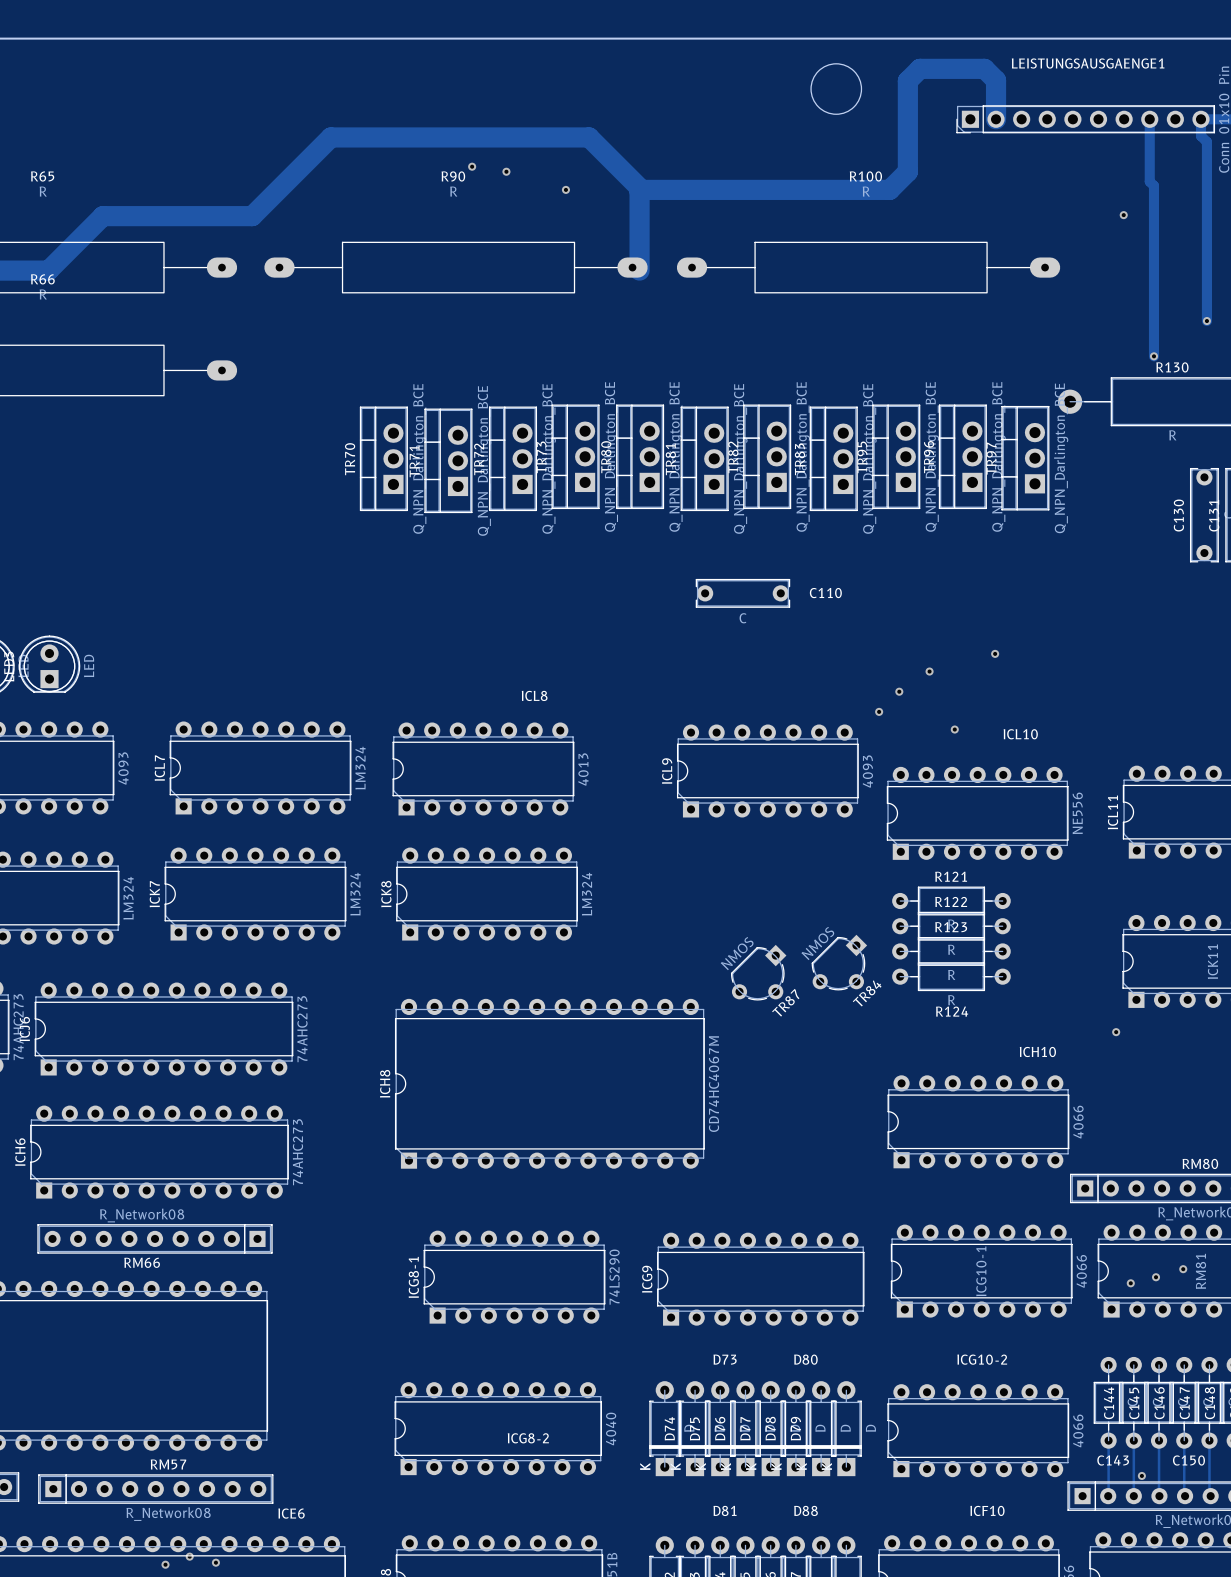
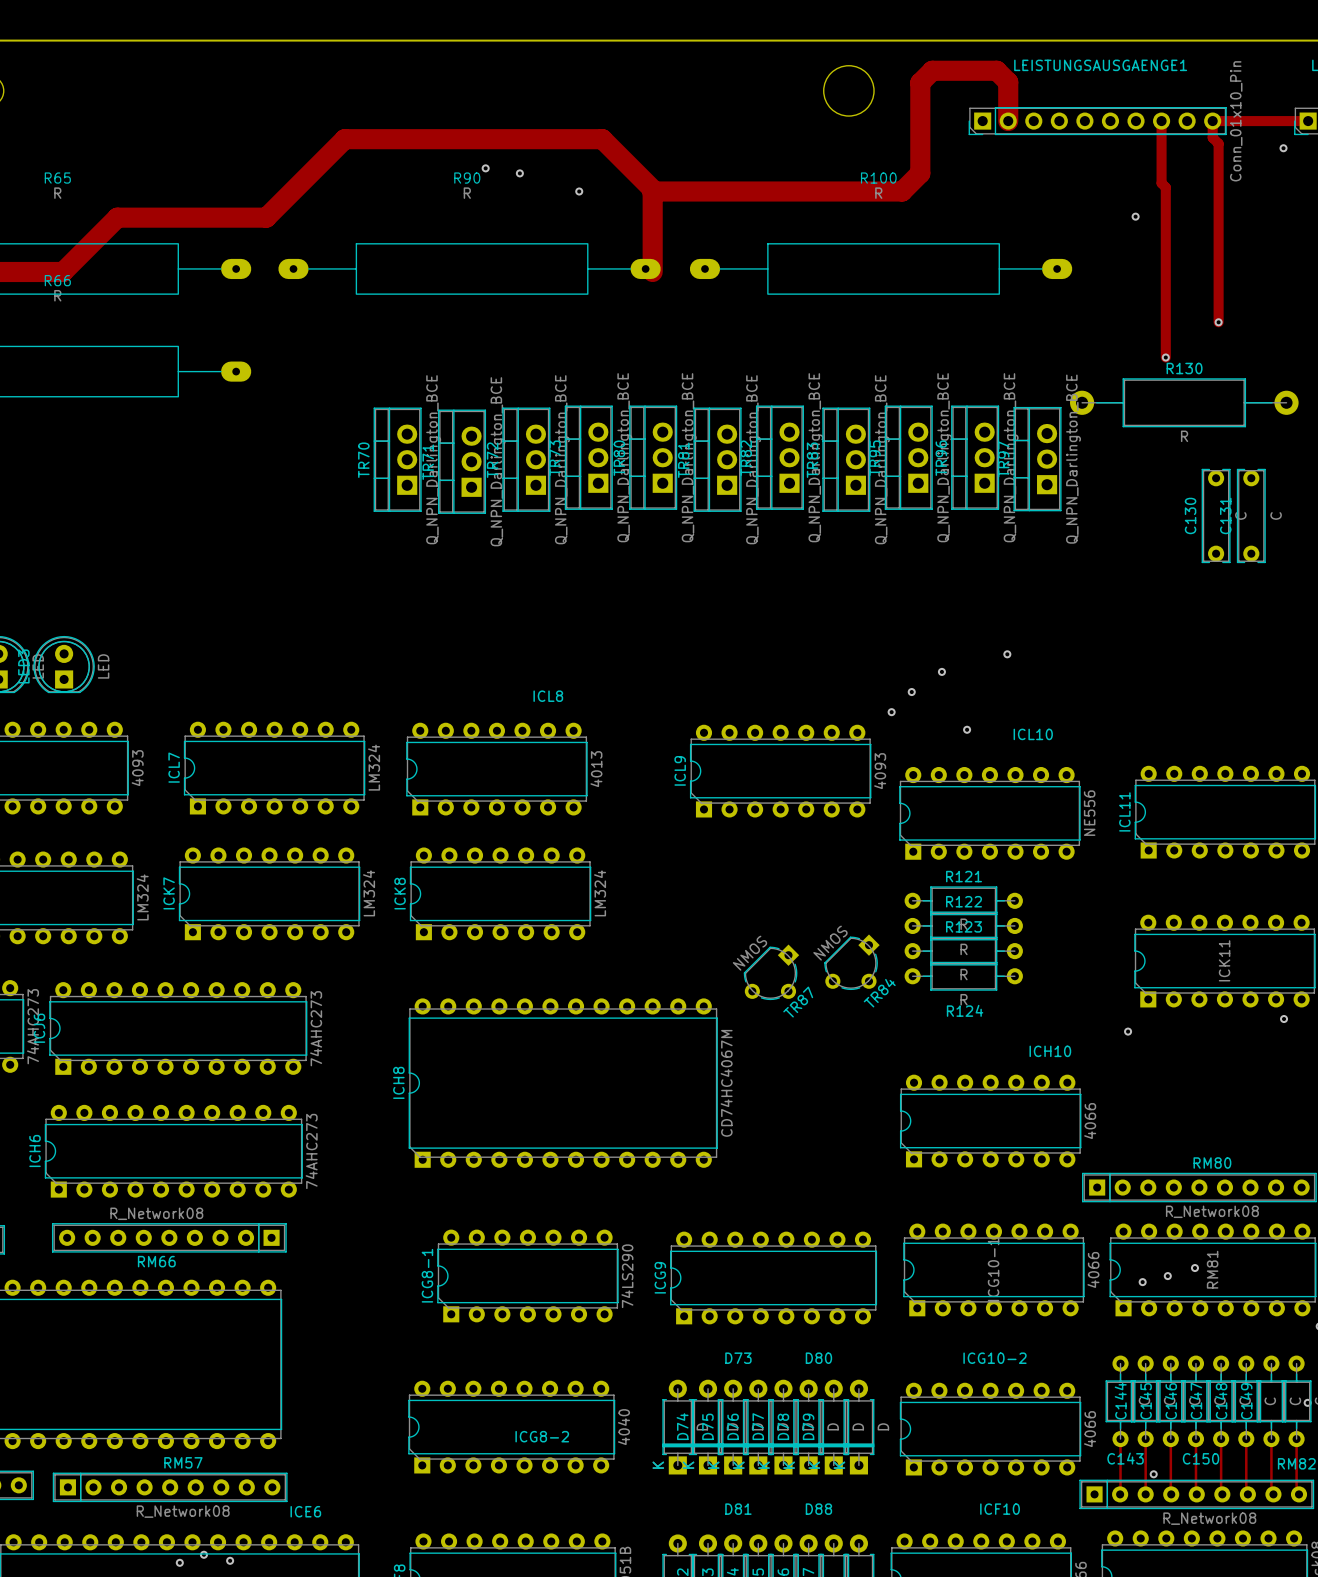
C110: C (742, 593) -> none

